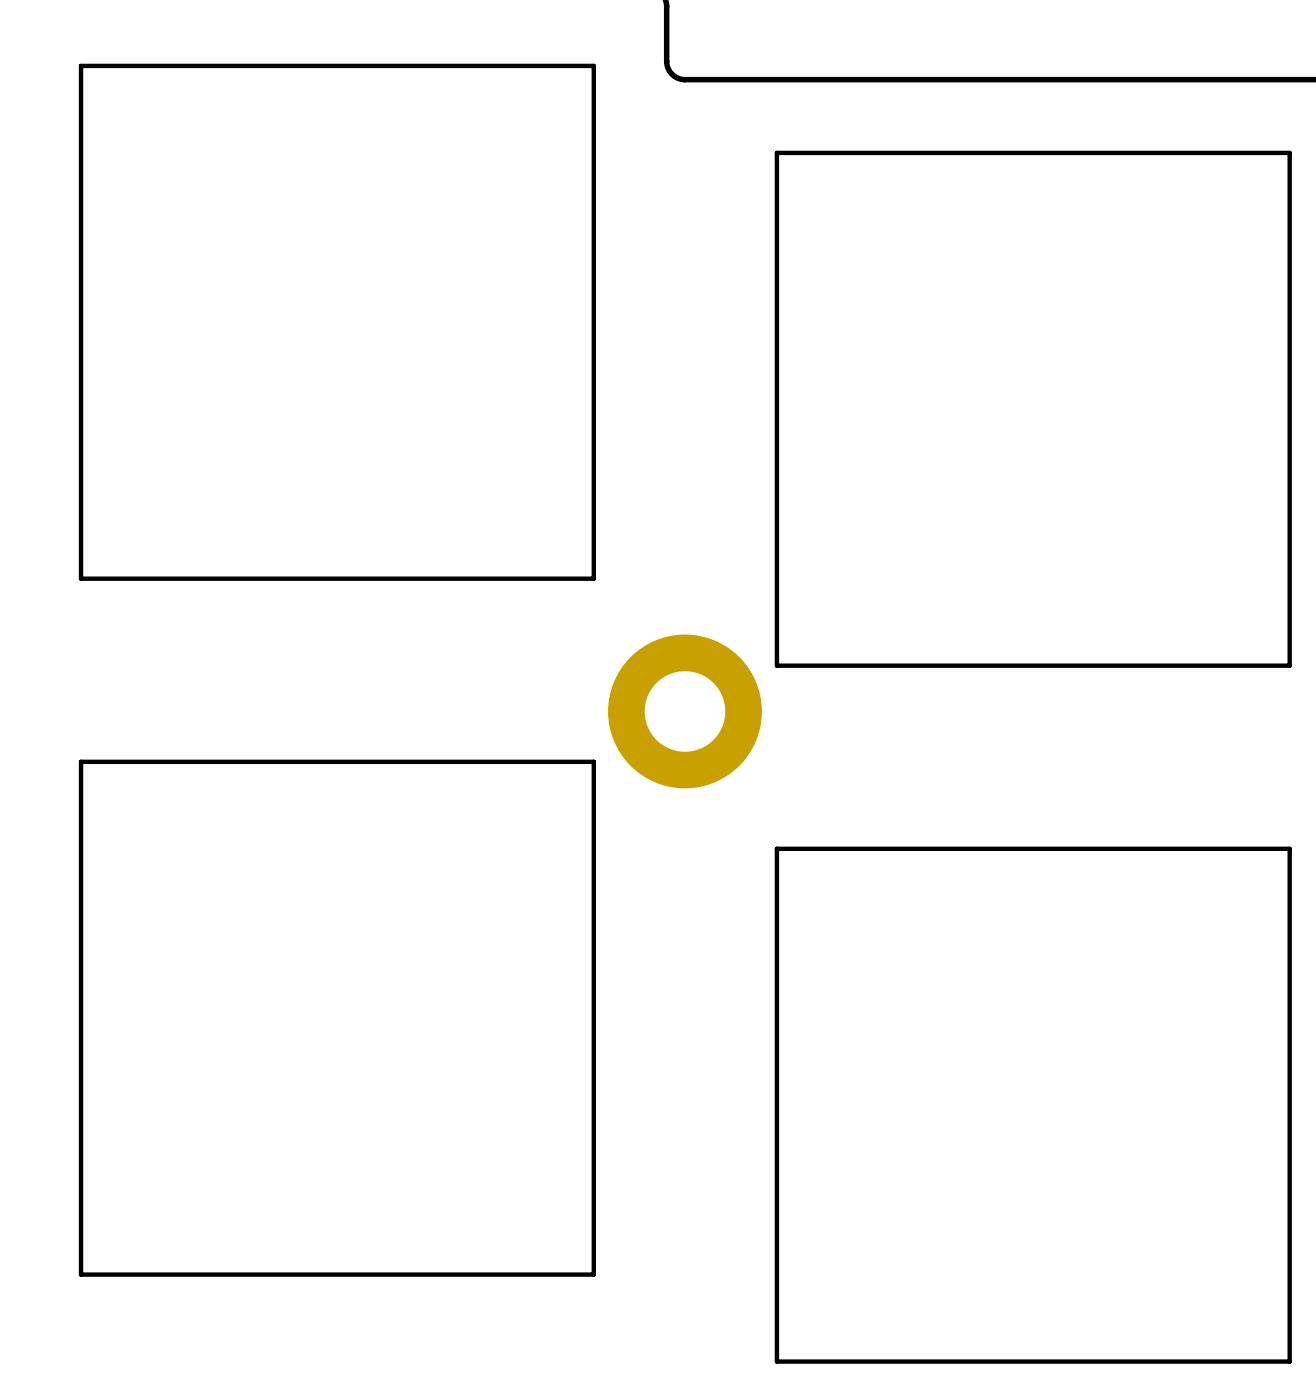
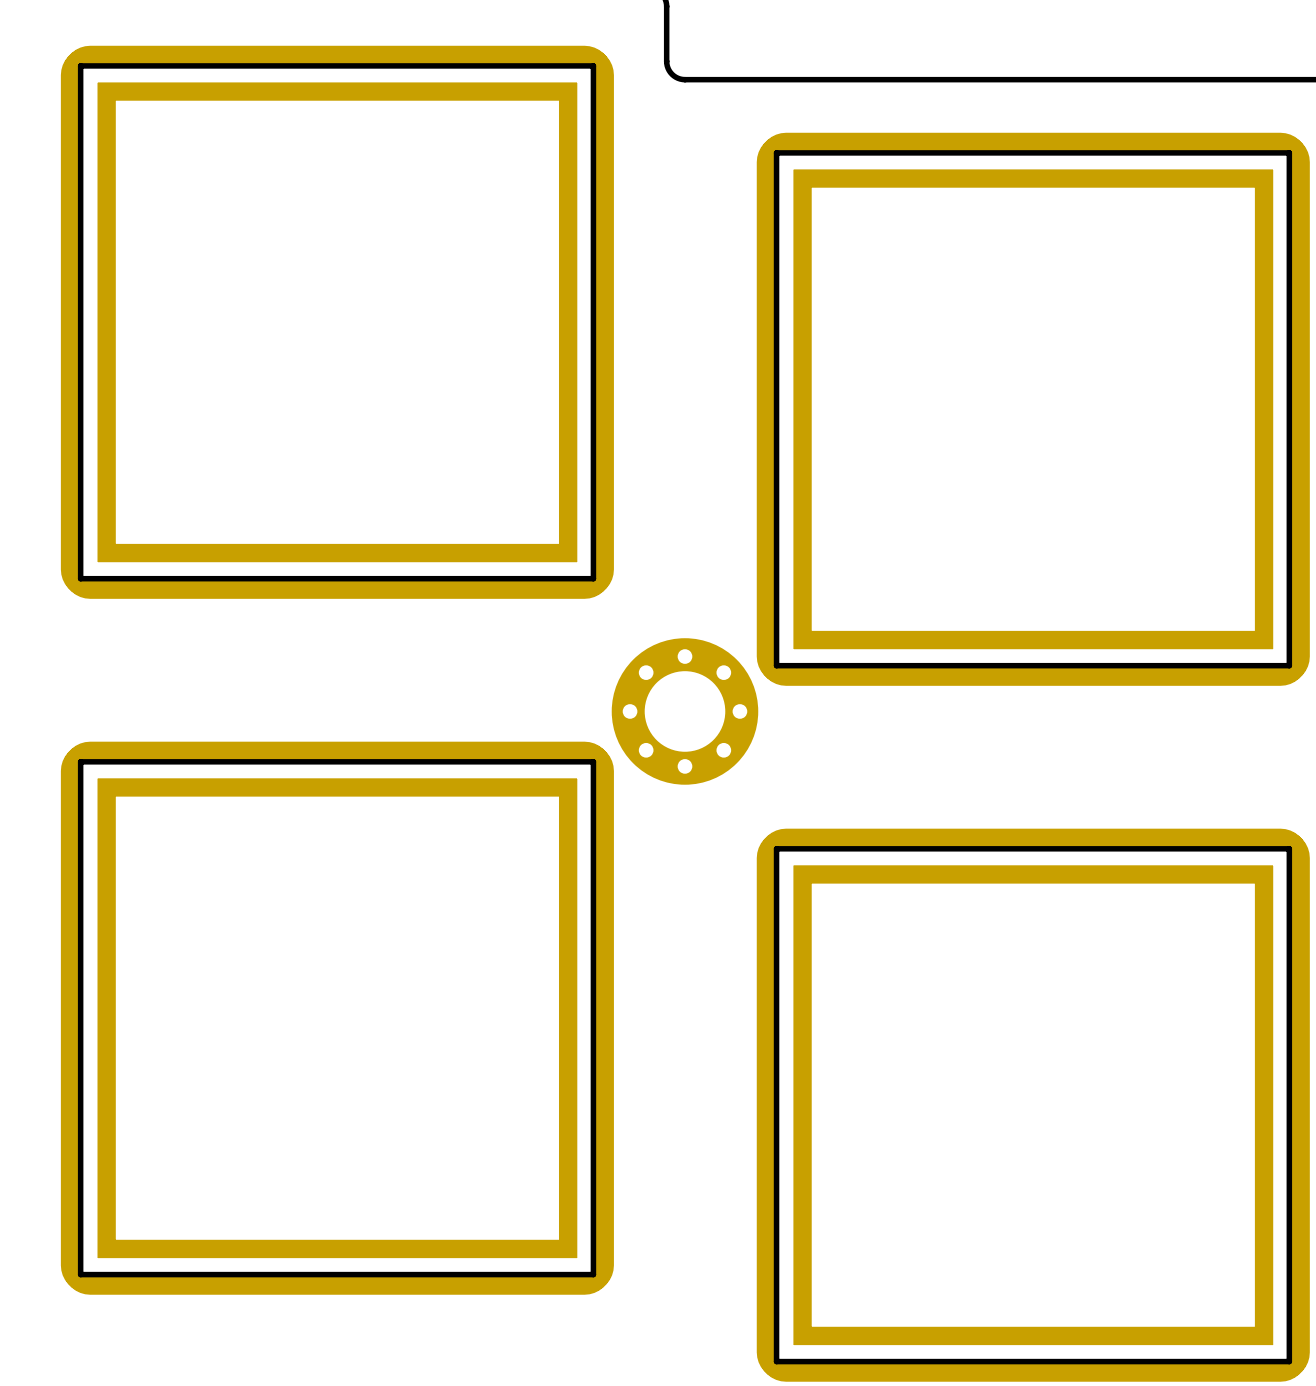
drawing: [78, 63, 596, 581] -> none
board edge: none -> (80, 65) (80, 578) (593, 578) (593, 65) (80, 65)
drawing: [774, 150, 1292, 668] -> none
board edge: none -> (776, 152) (776, 665) (1289, 665) (1289, 152) (776, 152)
part: none -> (337, 322)
part: none -> (1033, 409)
part footprint: [608, 634, 762, 789] -> [611, 638, 759, 785]
drawing: [78, 759, 596, 1277] -> none
board edge: none -> (80, 761) (80, 1274) (593, 1274) (593, 761) (80, 761)
drawing: [774, 846, 1292, 1364] -> none
board edge: none -> (776, 848) (776, 1361) (1289, 1361) (1289, 848) (776, 848)
part: none -> (337, 1018)
part: none -> (1033, 1105)

